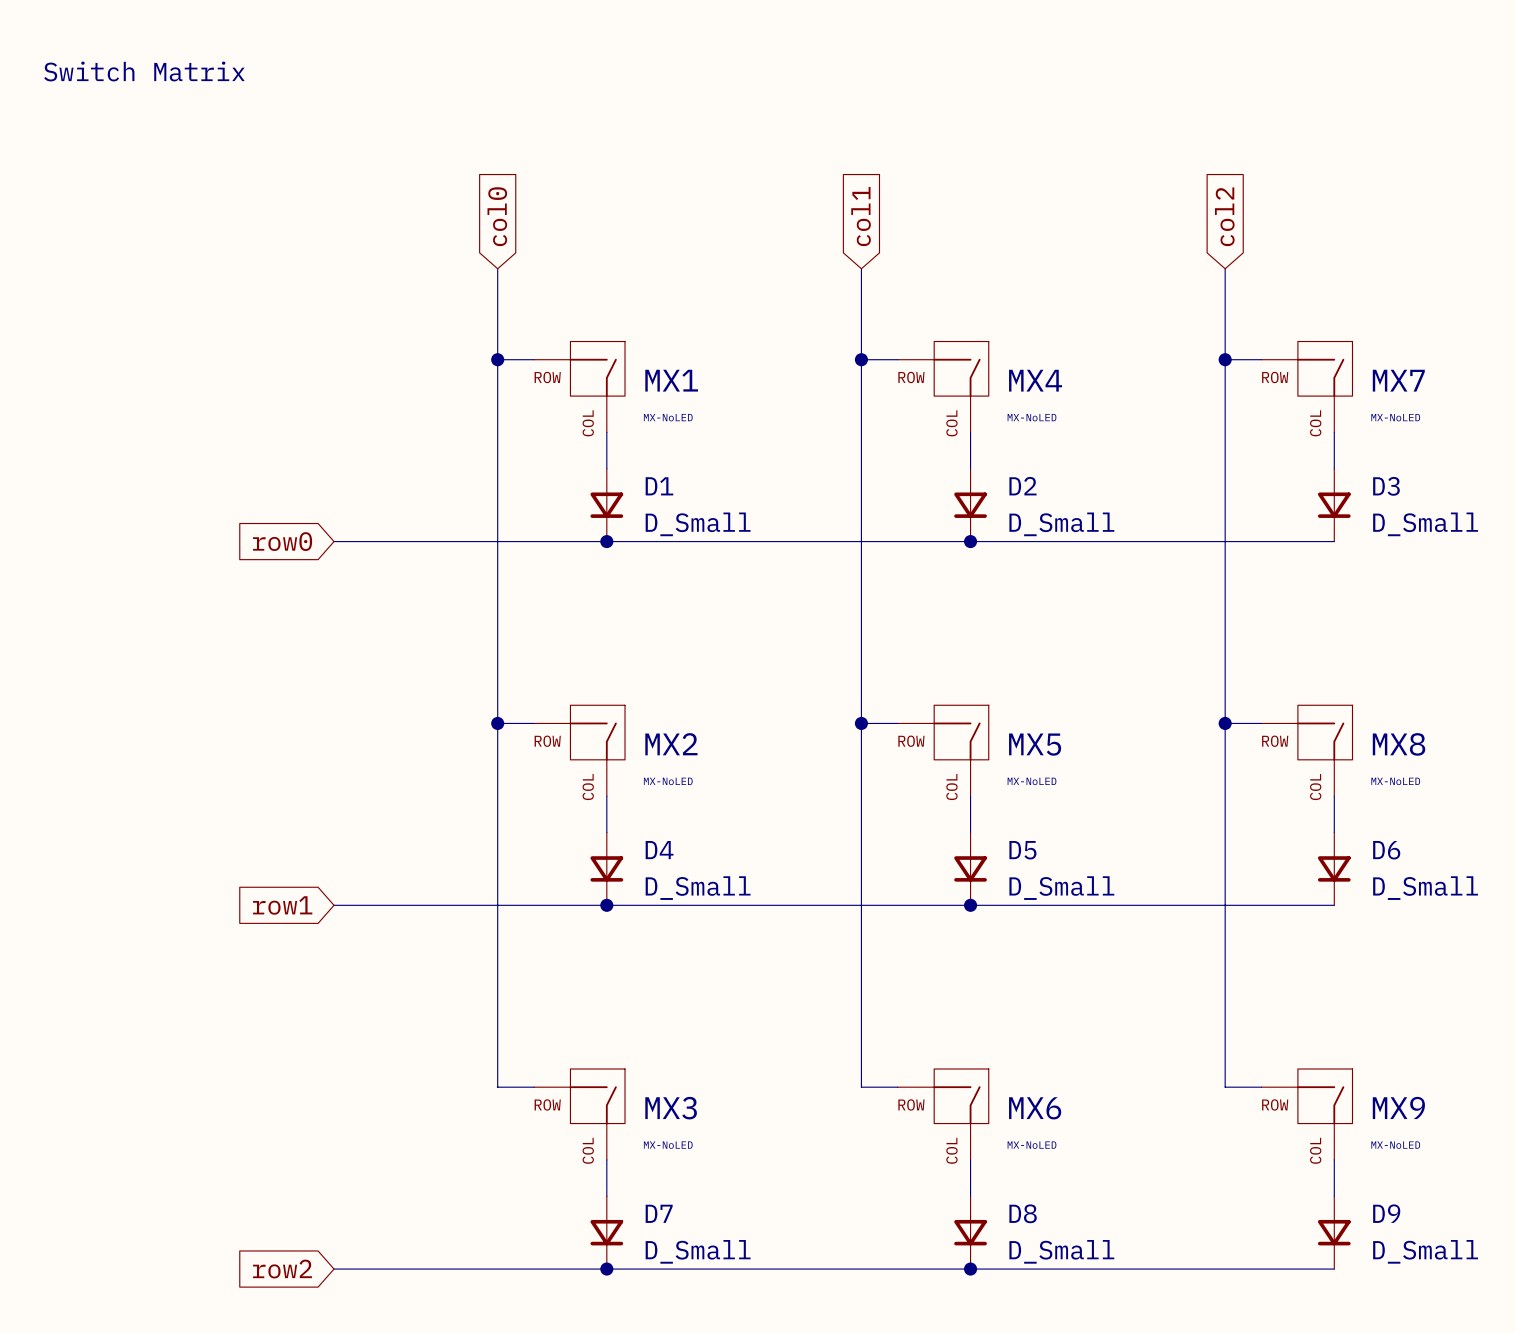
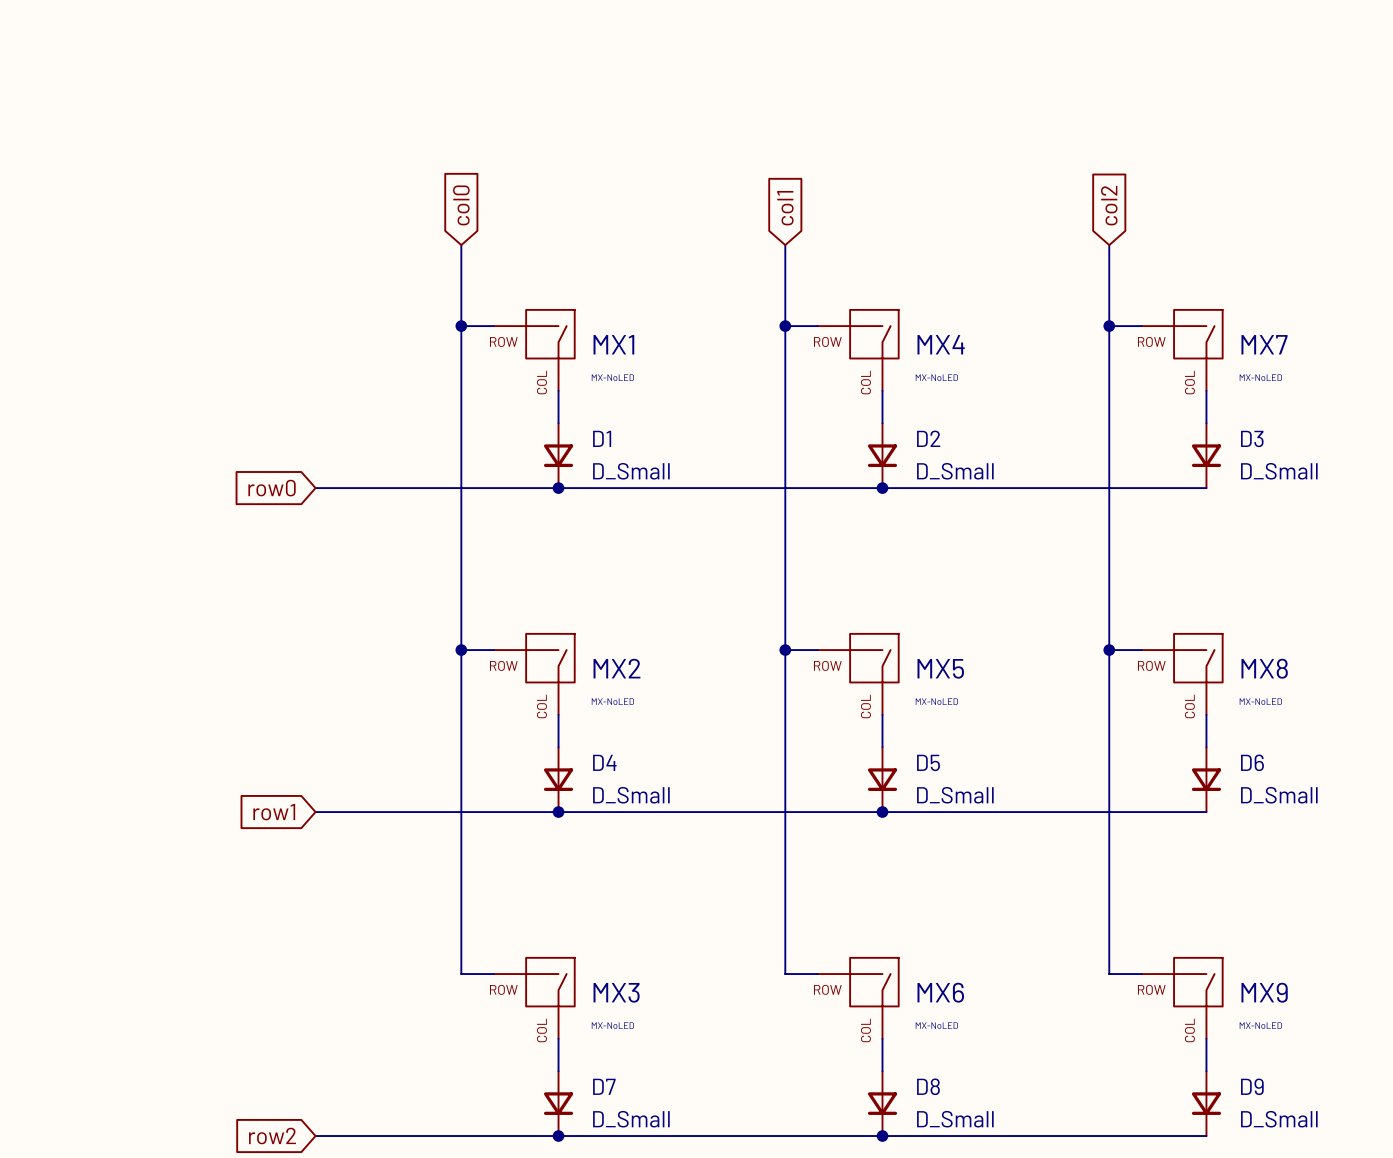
text: Switch Matrix (144, 71) -> none

